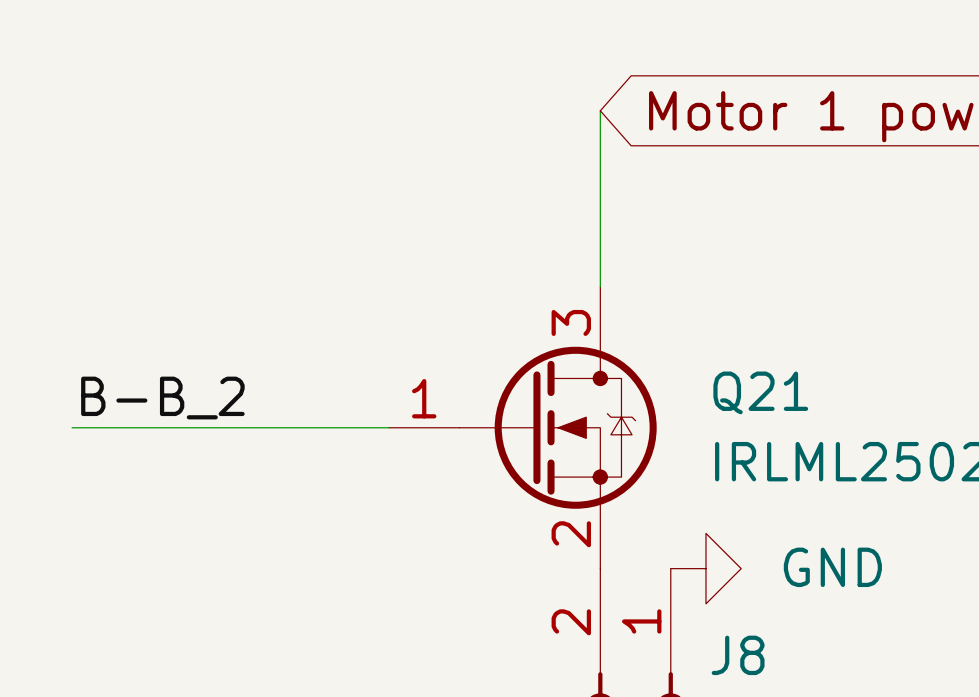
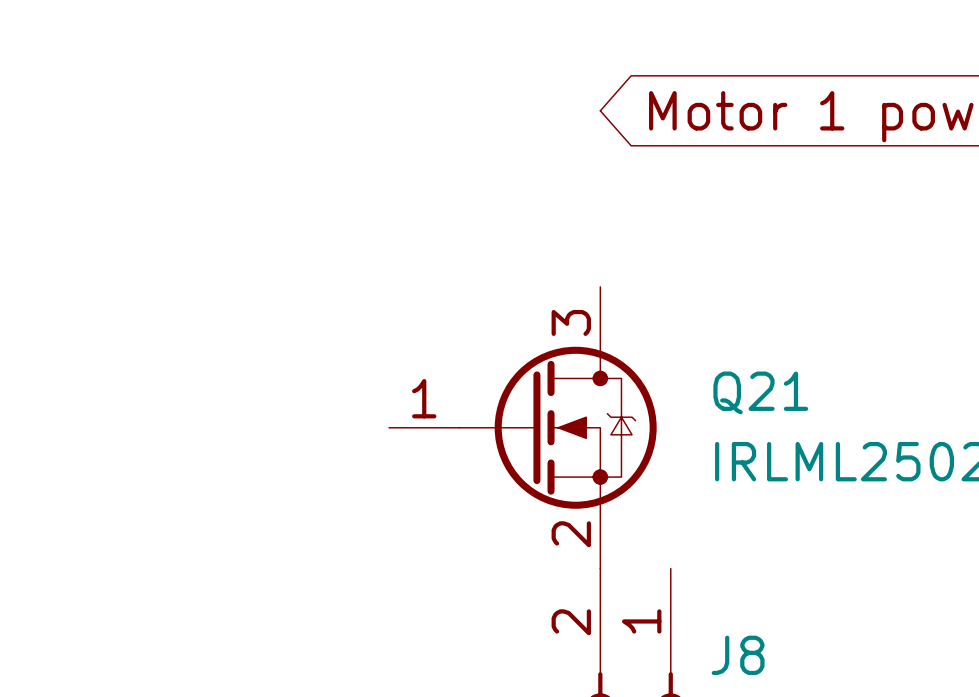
wire: (600, 110) (600, 286) -> none
label: B-B_2 (162, 398) -> none
wire: (72, 427) (389, 427) -> none
power symbol: GND (705, 568) -> none

